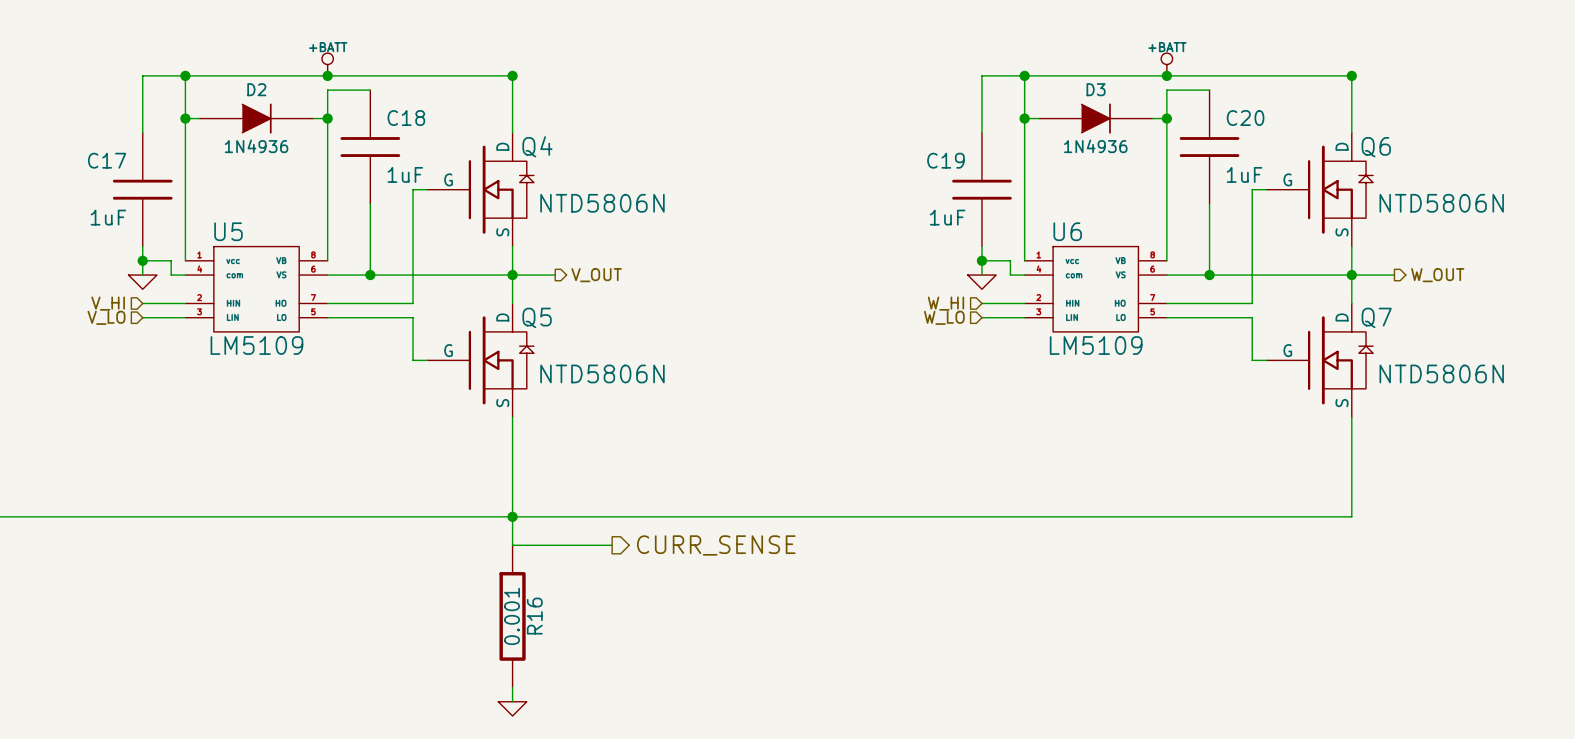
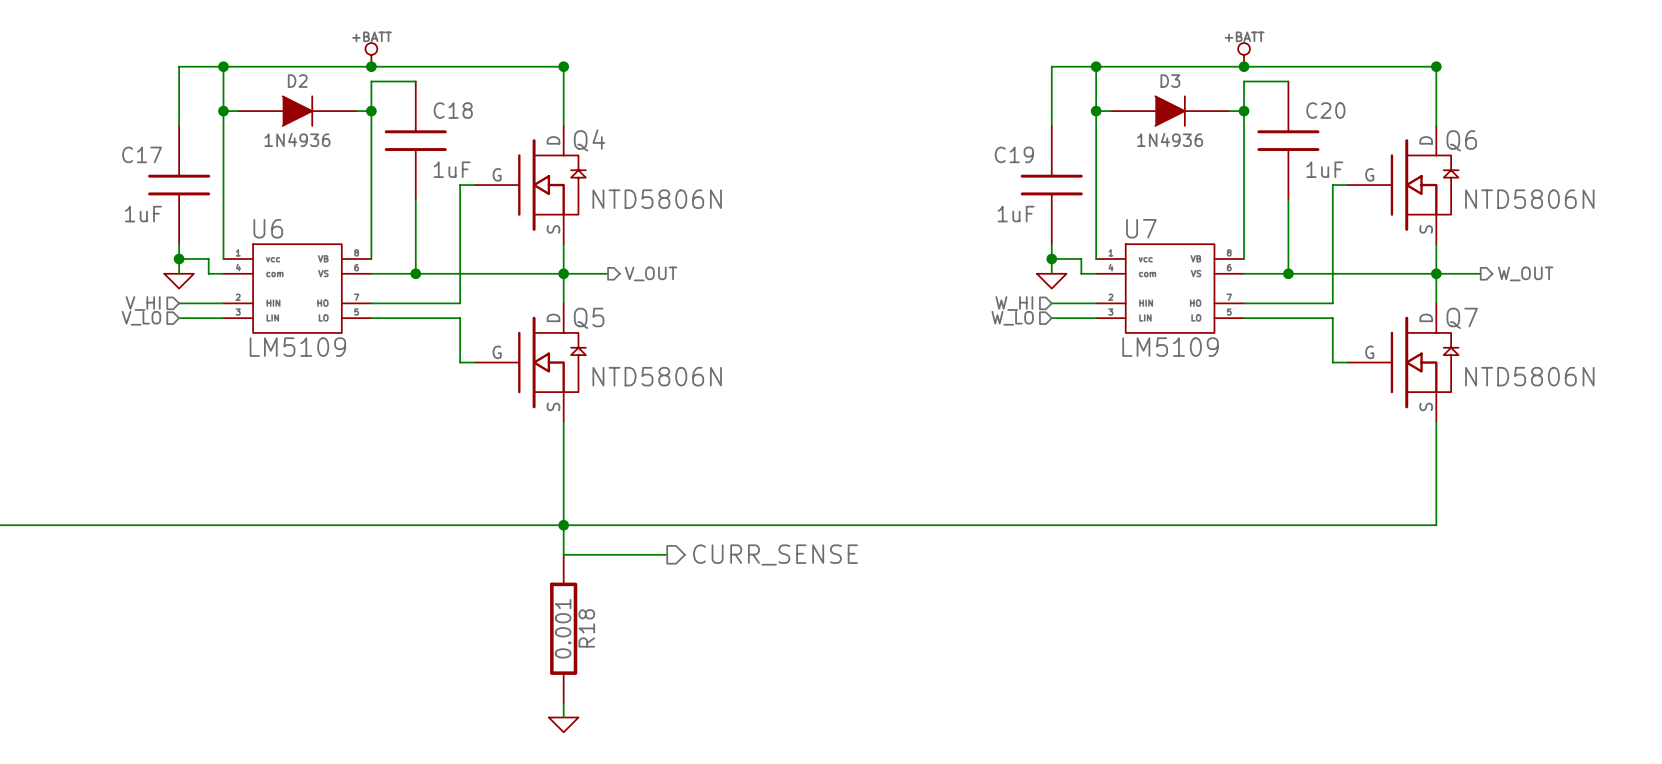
U5 name: U5 (228, 231) -> U6 (268, 228)
U6 name: U6 (1067, 231) -> U7 (1141, 228)
R16 name: R16 (534, 616) -> R18 (586, 628)

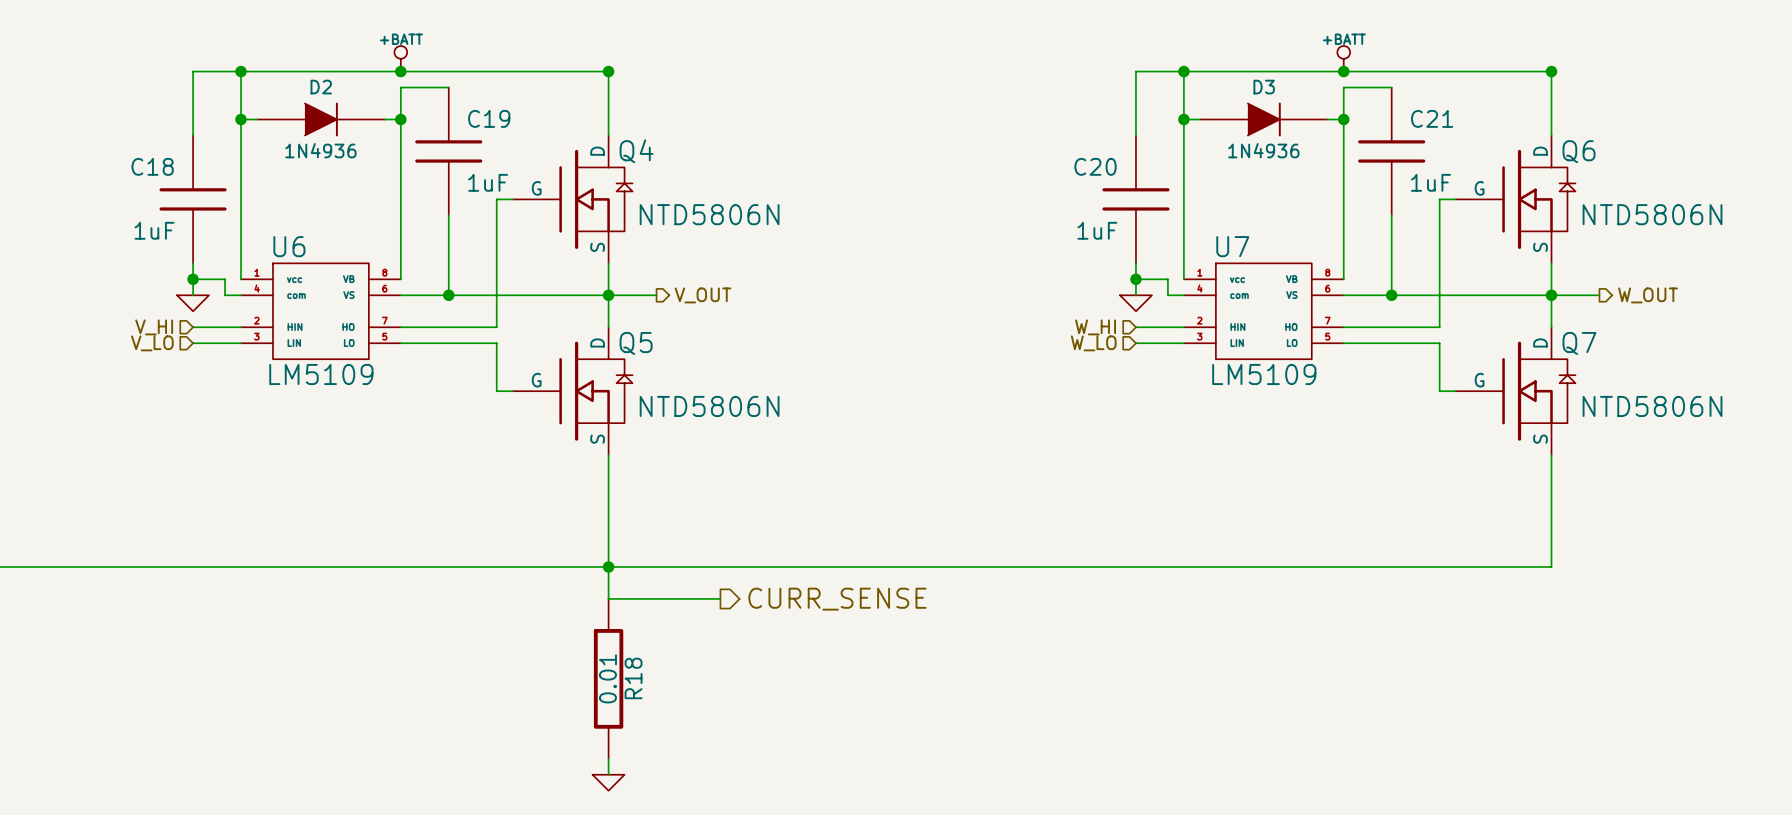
C18 name: C18 (453, 110) -> C19 (489, 118)
C20 name: C20 (1325, 110) -> C21 (1432, 118)
C17 name: C17 (142, 154) -> C18 (152, 166)
C19 name: C19 (1014, 154) -> C20 (1095, 166)
R18 value: 0.001 (563, 628) -> 0.01 (607, 678)

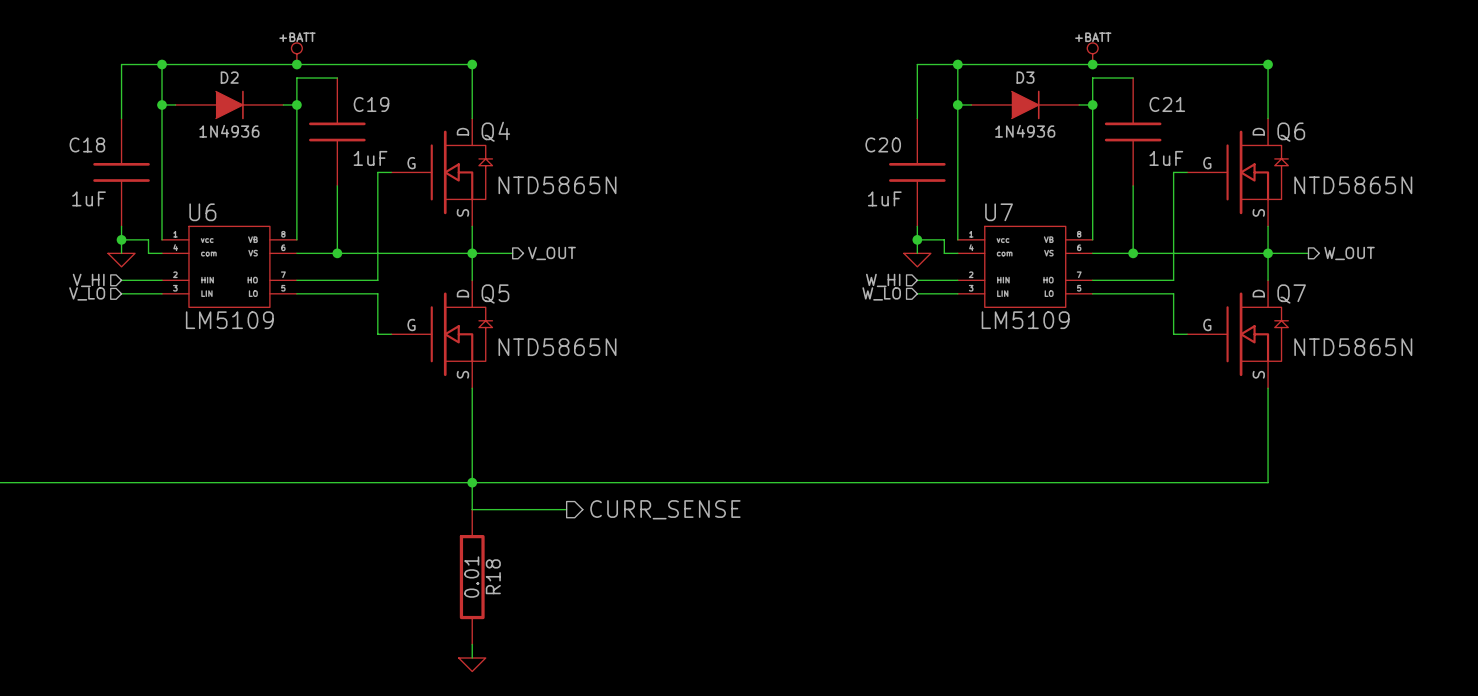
Q4 value: NTD5806N (709, 214) -> NTD5865N (557, 185)
Q6 value: NTD5806N (1652, 214) -> NTD5865N (1353, 185)
Q5 value: NTD5806N (709, 406) -> NTD5865N (557, 347)
Q7 value: NTD5806N (1652, 406) -> NTD5865N (1353, 347)

